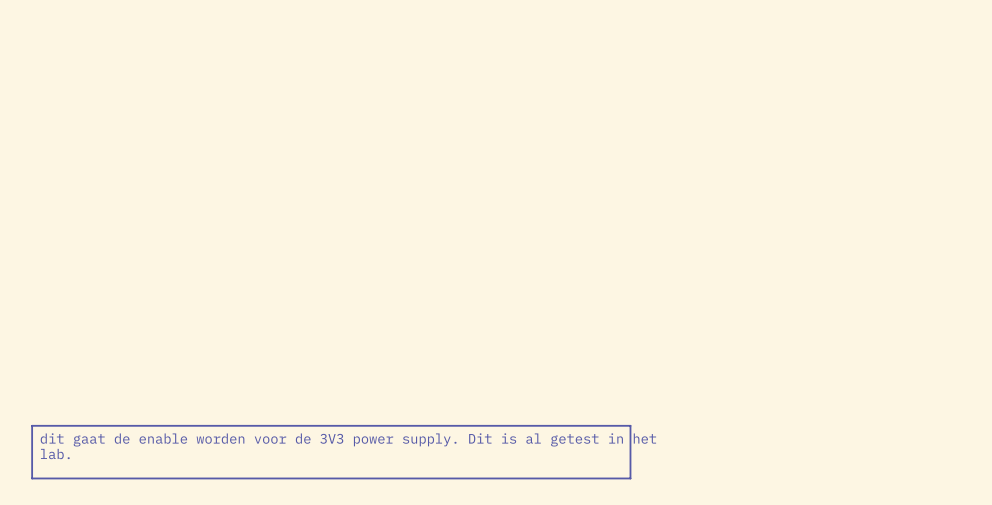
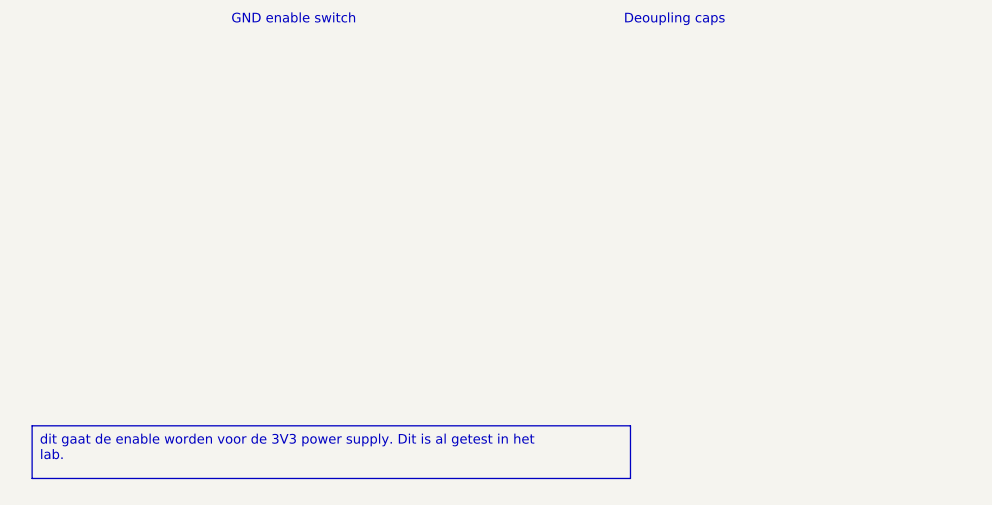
text: none -> GND enable switch (293, 17)
text: none -> Deoupling caps (674, 18)

